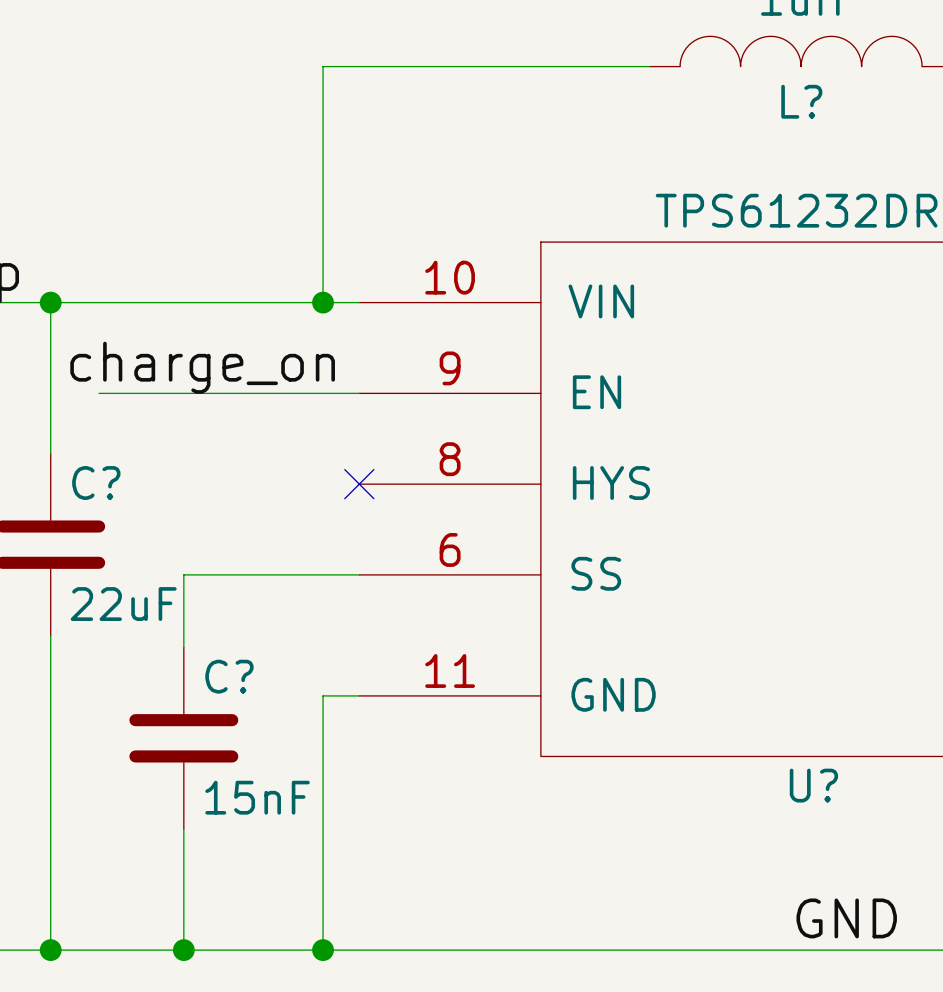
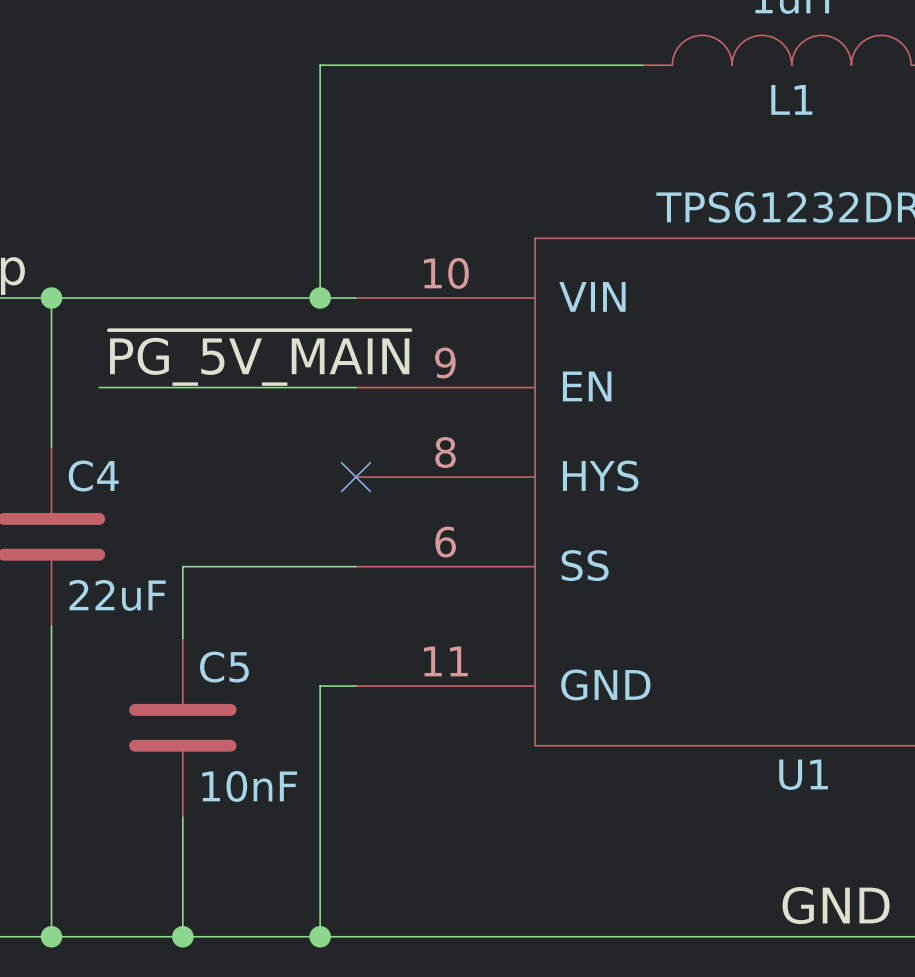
L? name: L? (801, 101) -> L1 (791, 99)
label: none -> ~{PG_5V_MAIN} (259, 357)
label: charge_on (202, 367) -> none
C? name: C? (96, 483) -> C4 (93, 476)
C? name: C? (229, 676) -> C5 (224, 667)
U? name: U? (813, 785) -> U1 (803, 774)
C? value: 15nF (257, 797) -> 10nF (249, 786)

